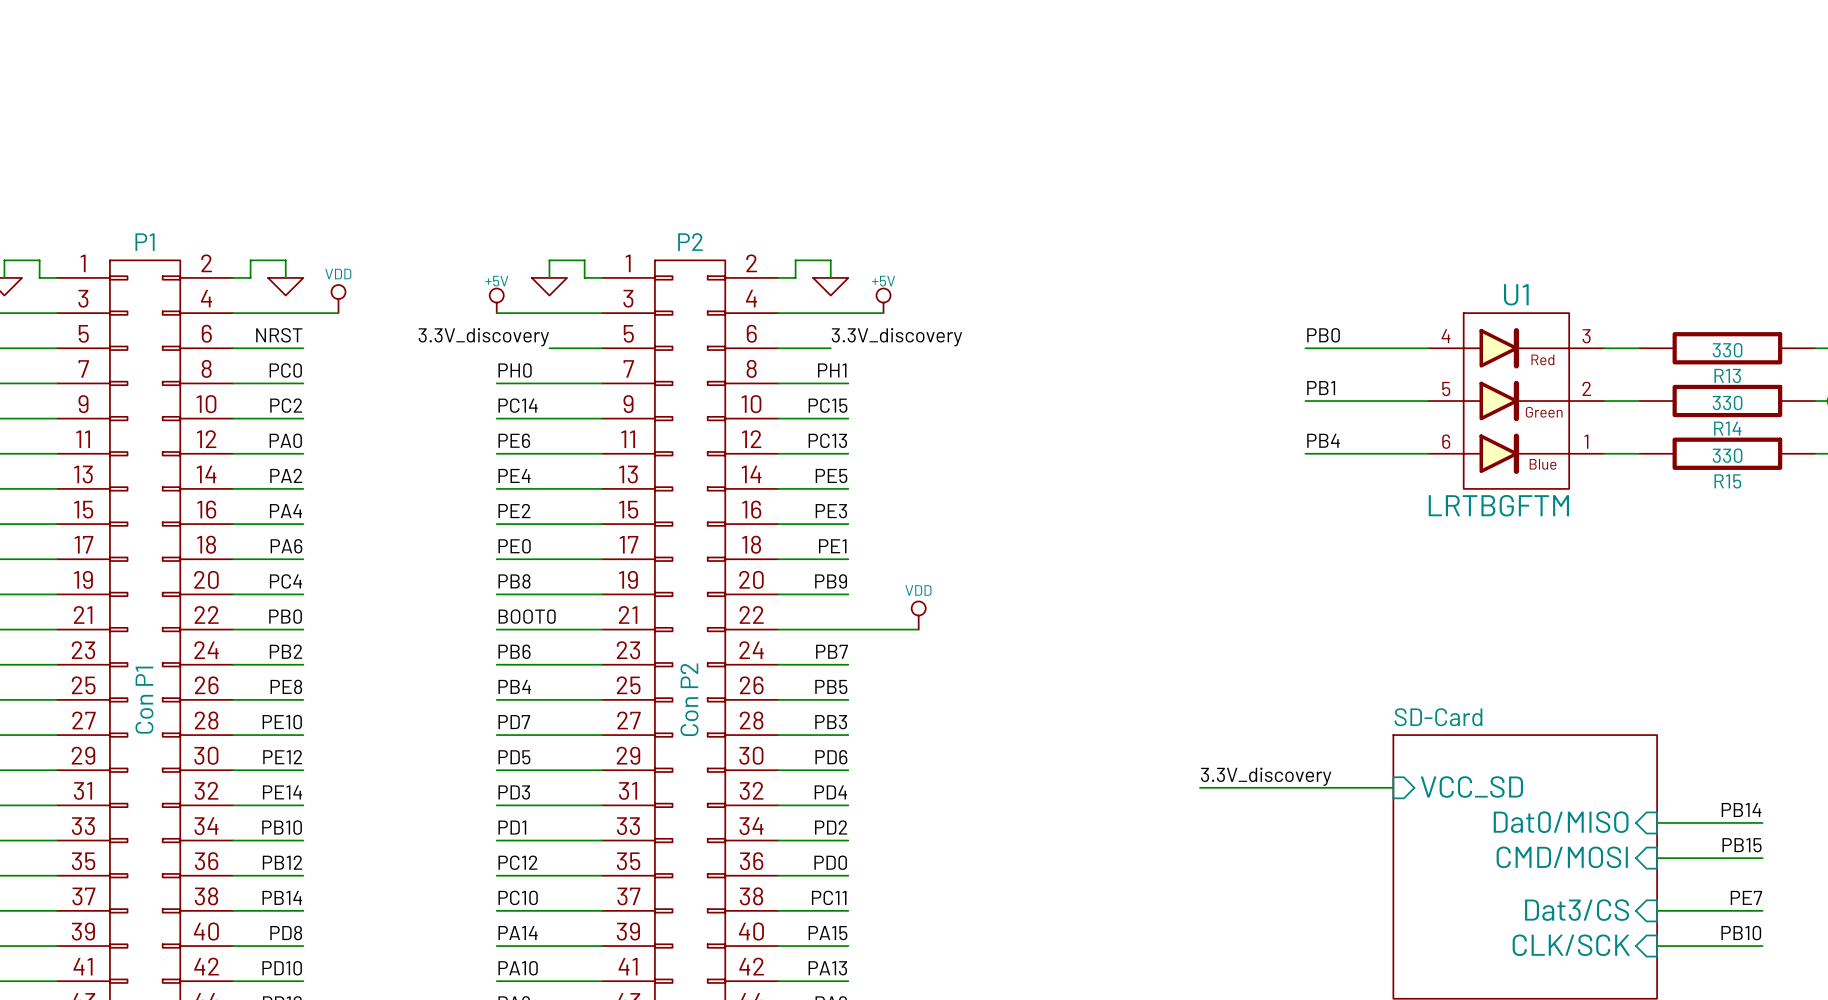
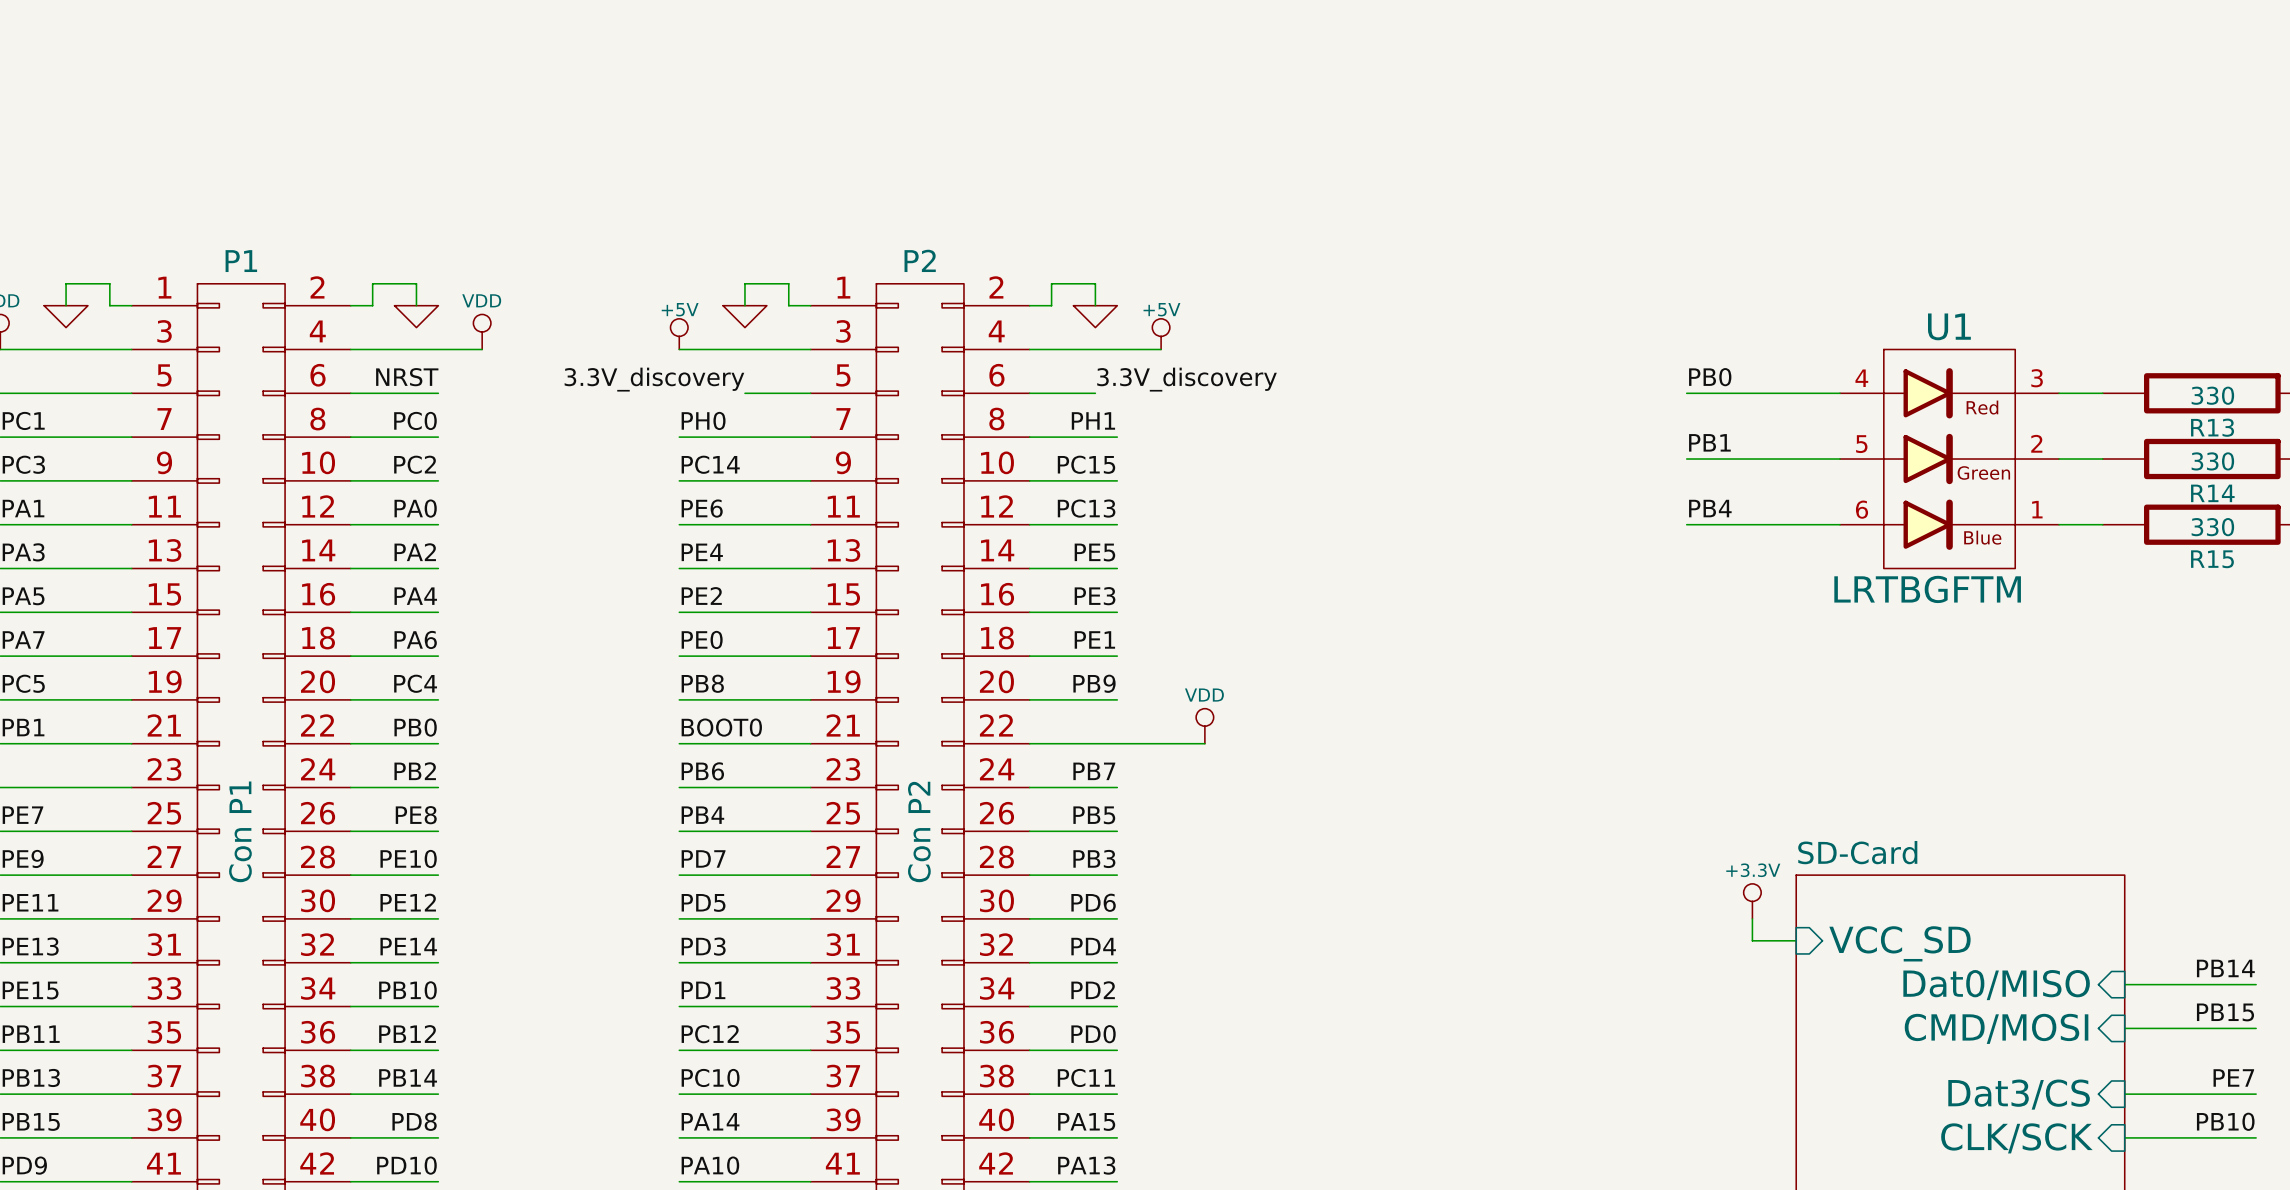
power symbol: none -> +3.3V (1752, 901)
label: 3.3V_discovery (1266, 776) -> none
wire: (1199, 787) (1358, 787) -> (1752, 918) (1752, 940)

